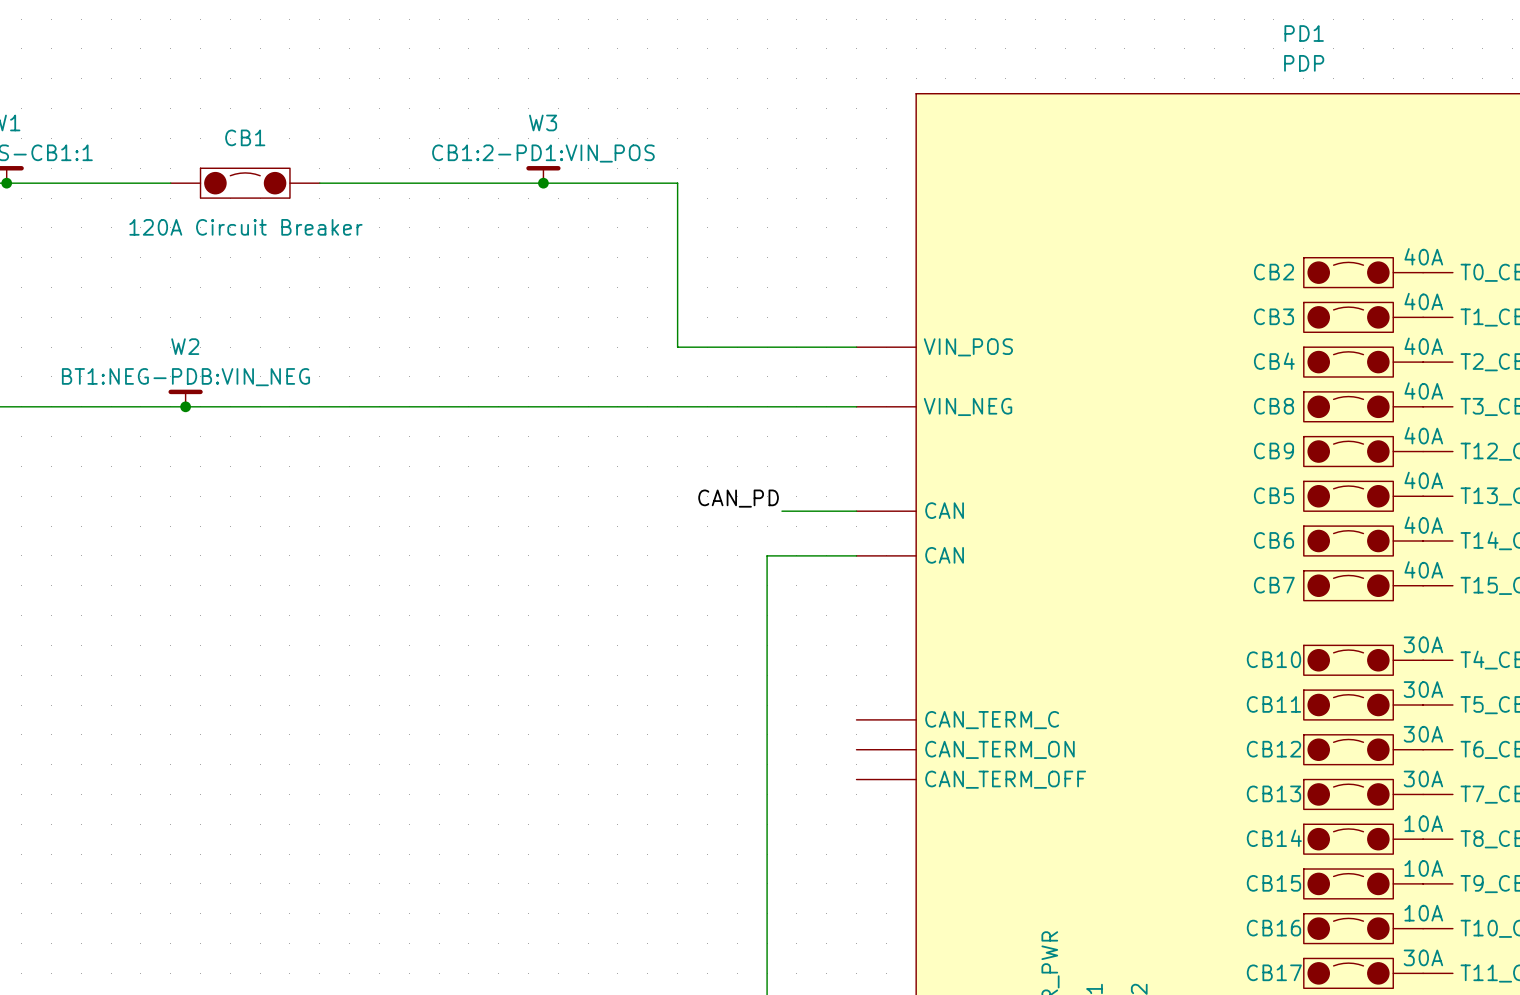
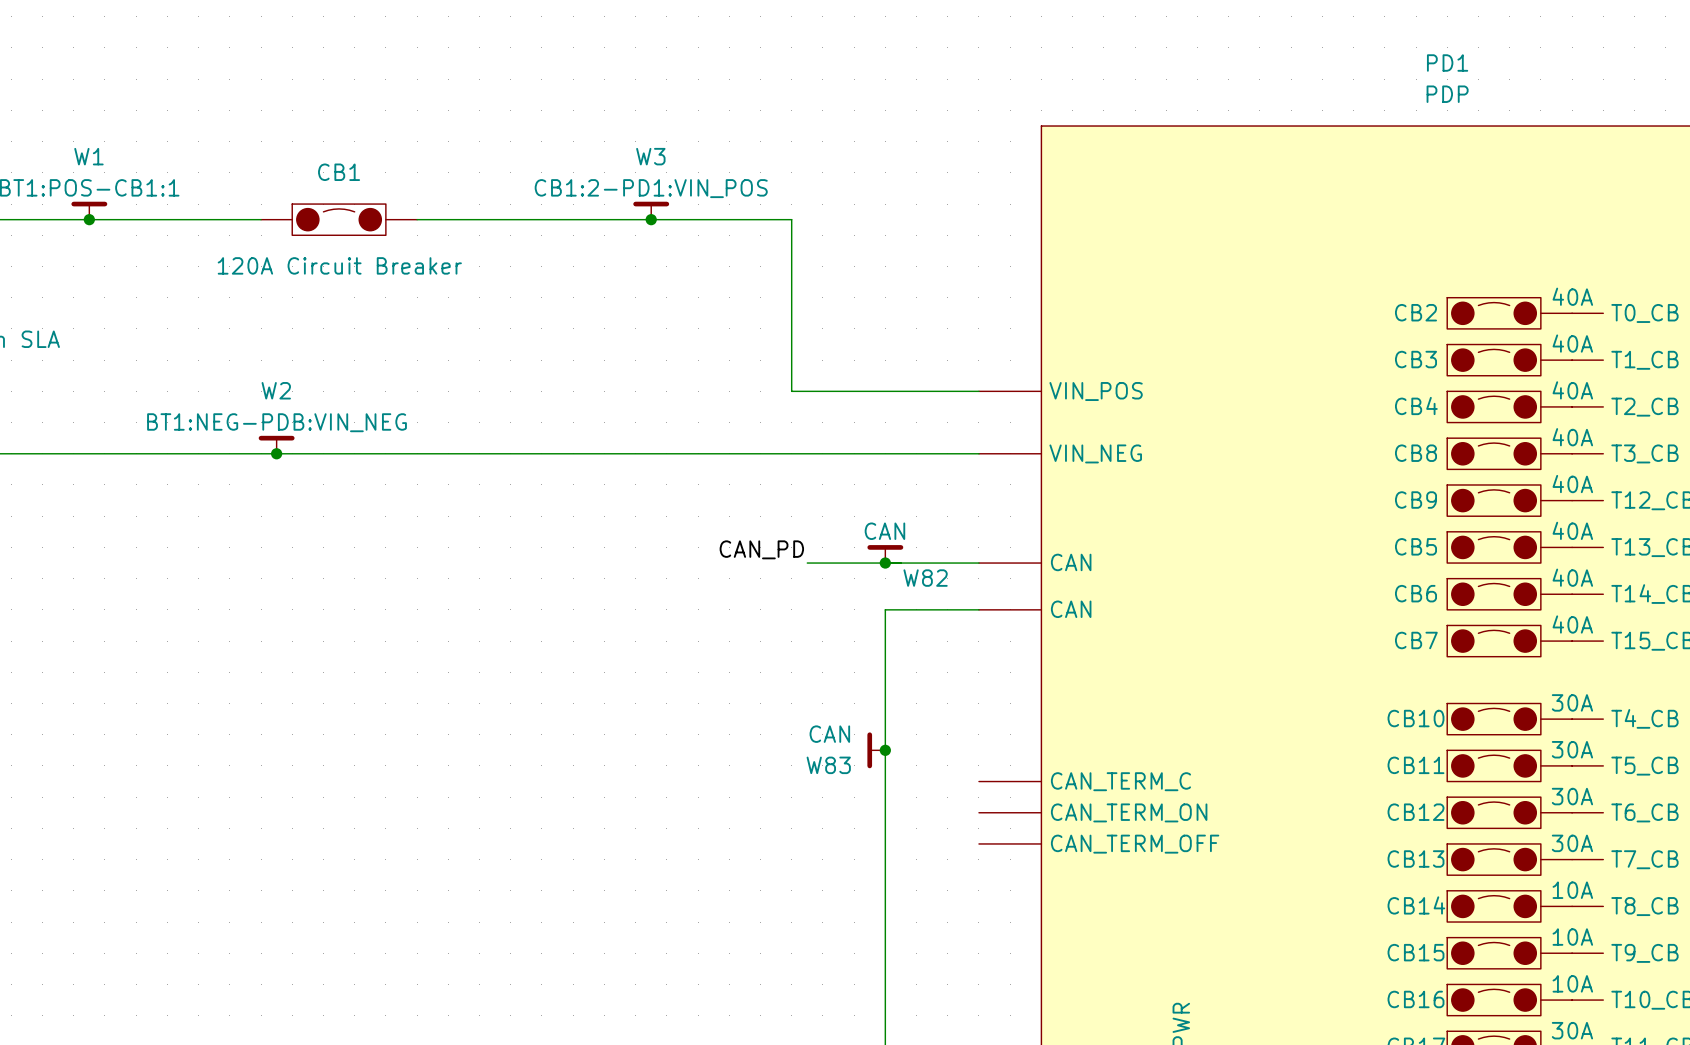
label position: CAN_PD (738, 498) -> CAN_PD (761, 549)
W82: none -> CAN (885, 554)
wire: none -> (807, 563) (900, 563)
junction: none -> (885, 563)
W83: none -> CAN (876, 750)
junction: none -> (885, 750)

